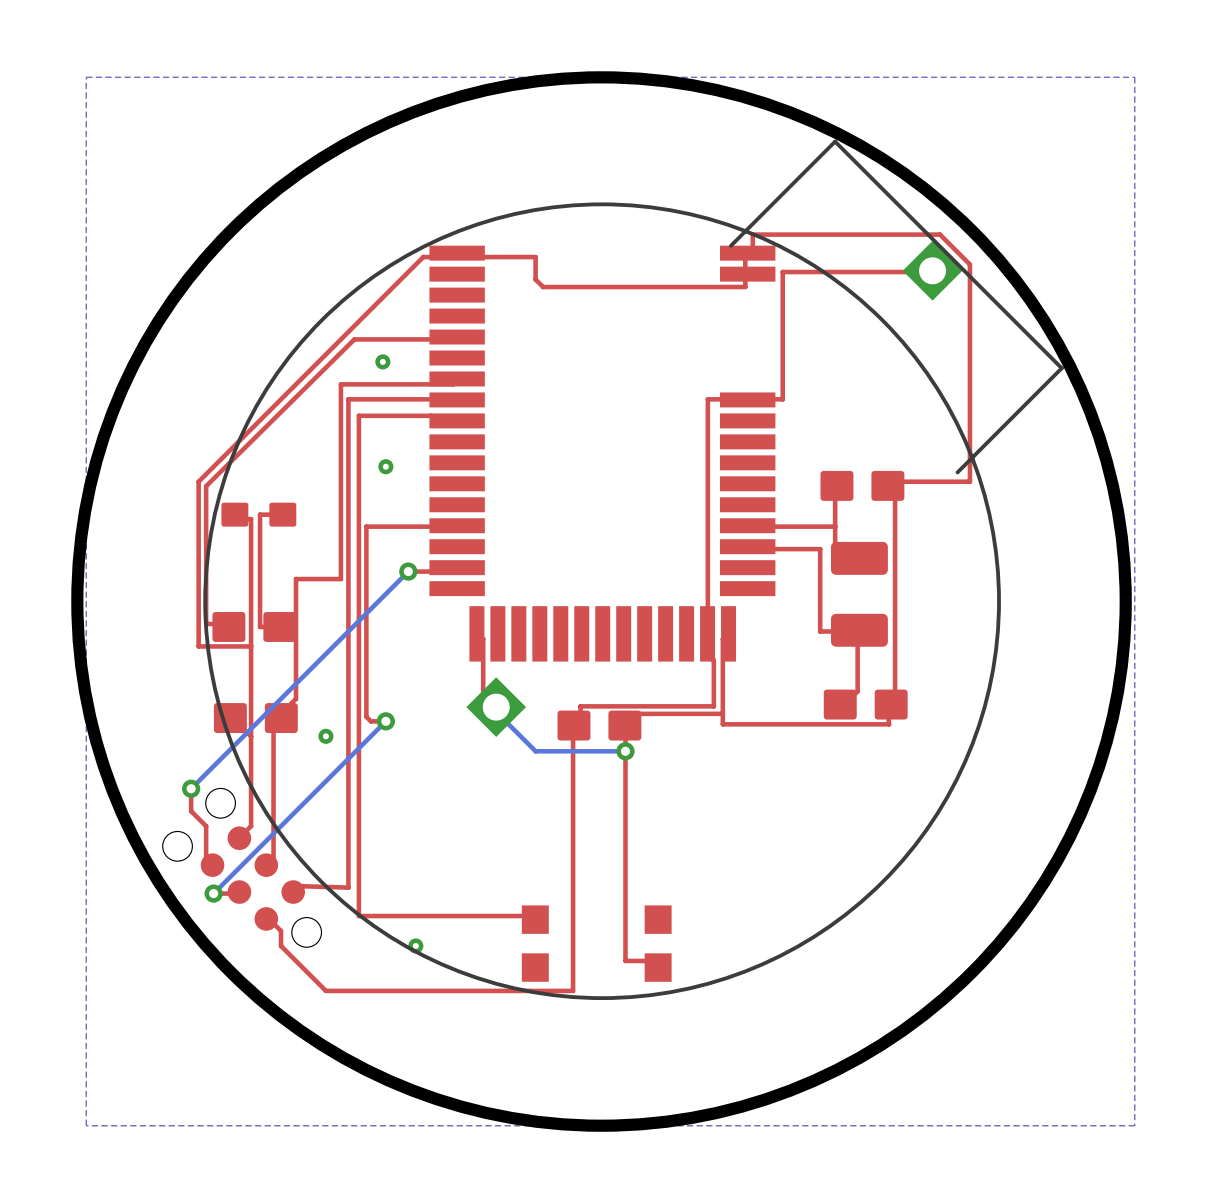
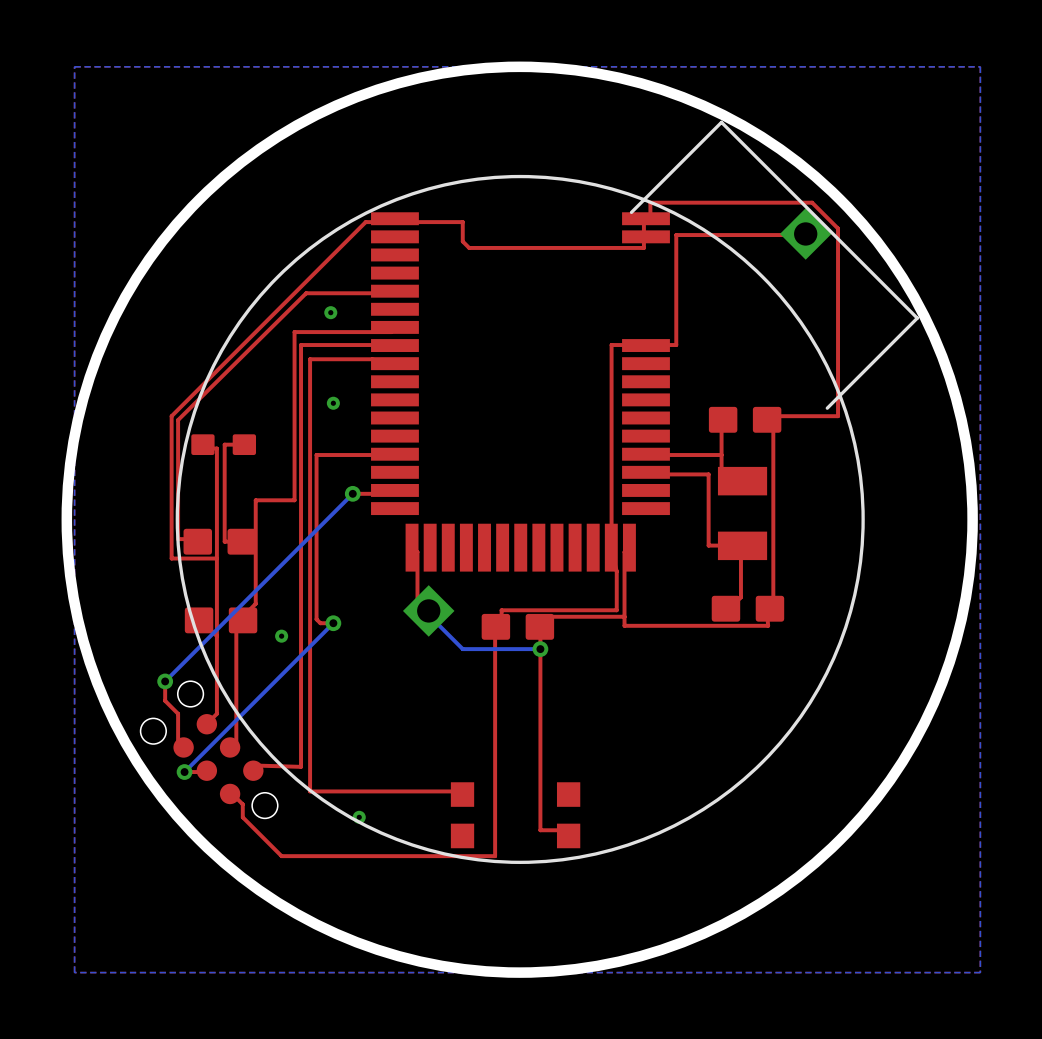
part footprint: [830, 541, 888, 647] -> [717, 466, 768, 561]

